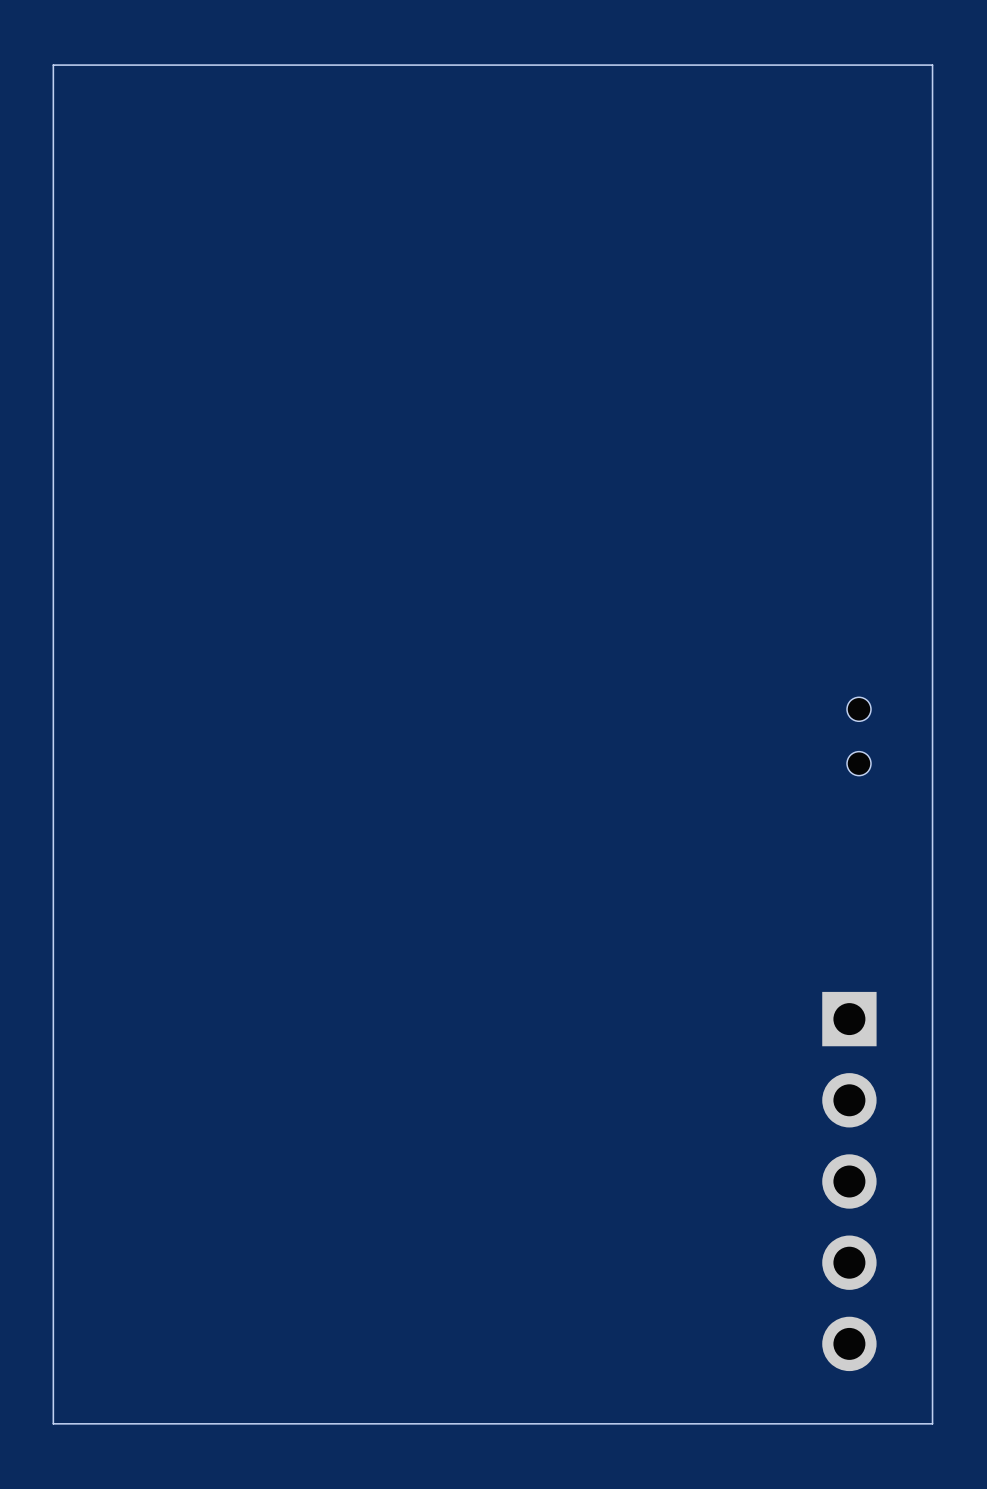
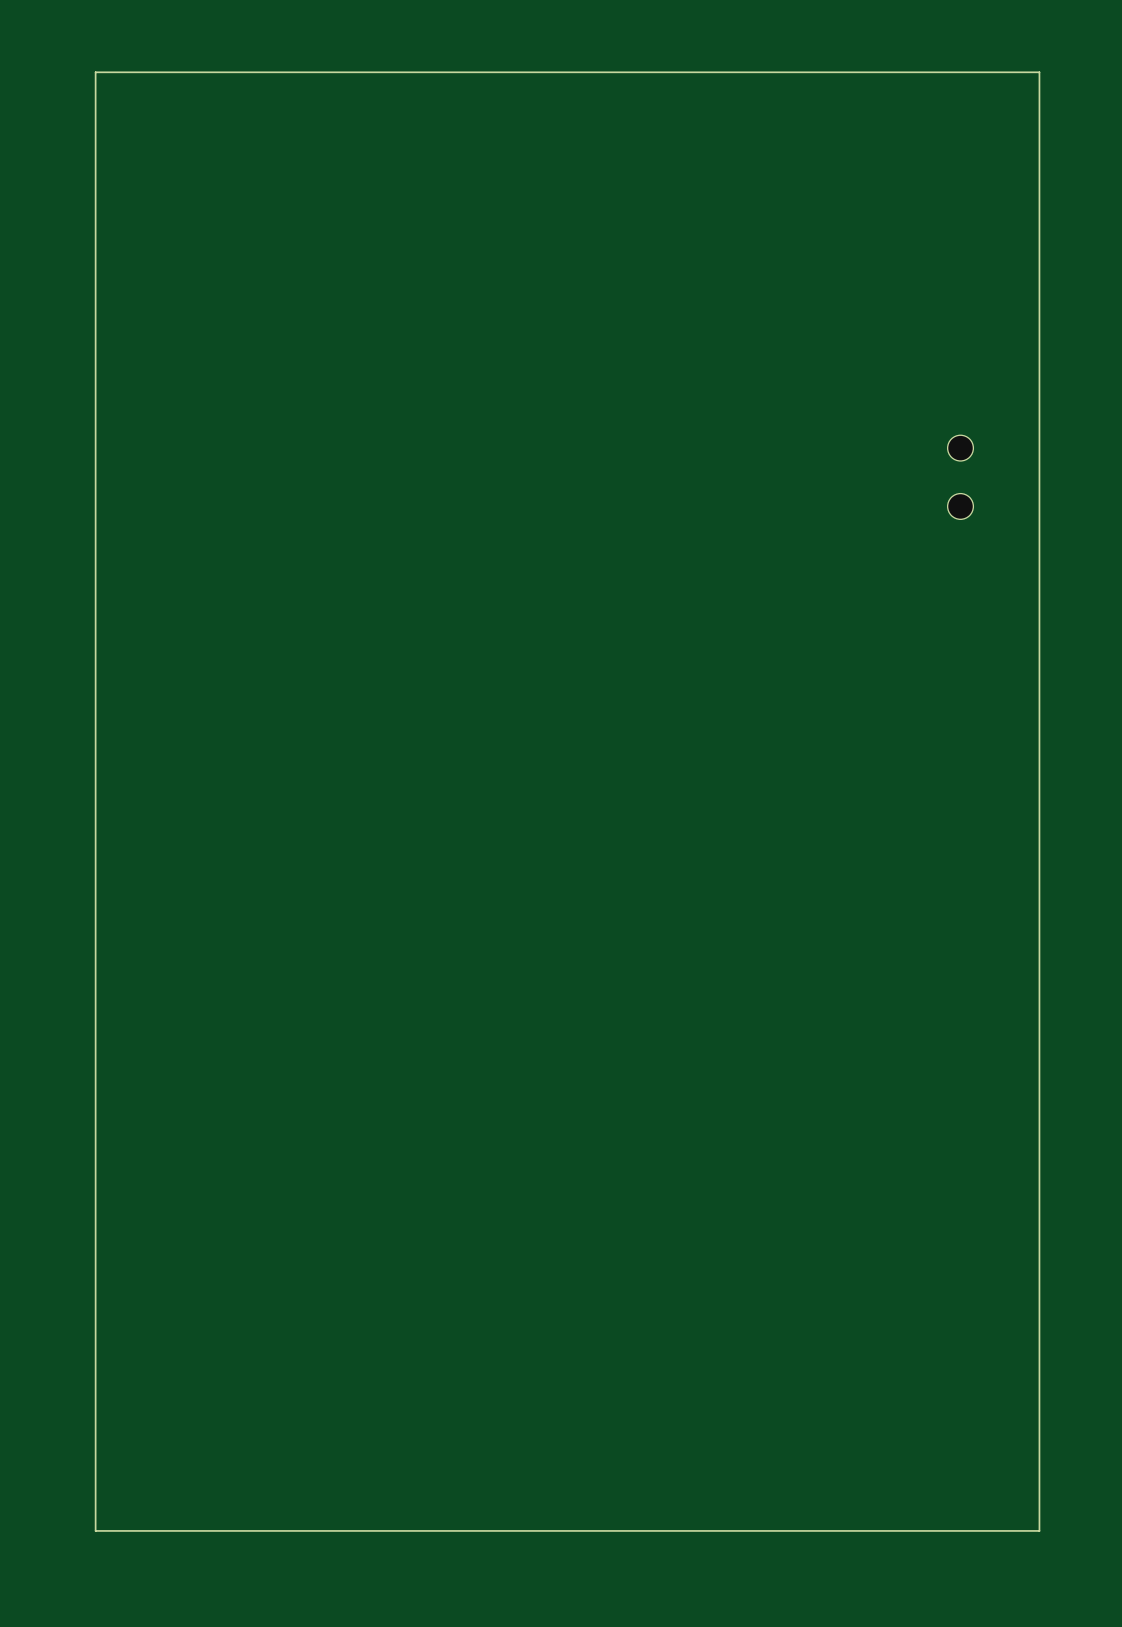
part position: (859, 736) -> (960, 477)
part: (849, 1181) -> none

